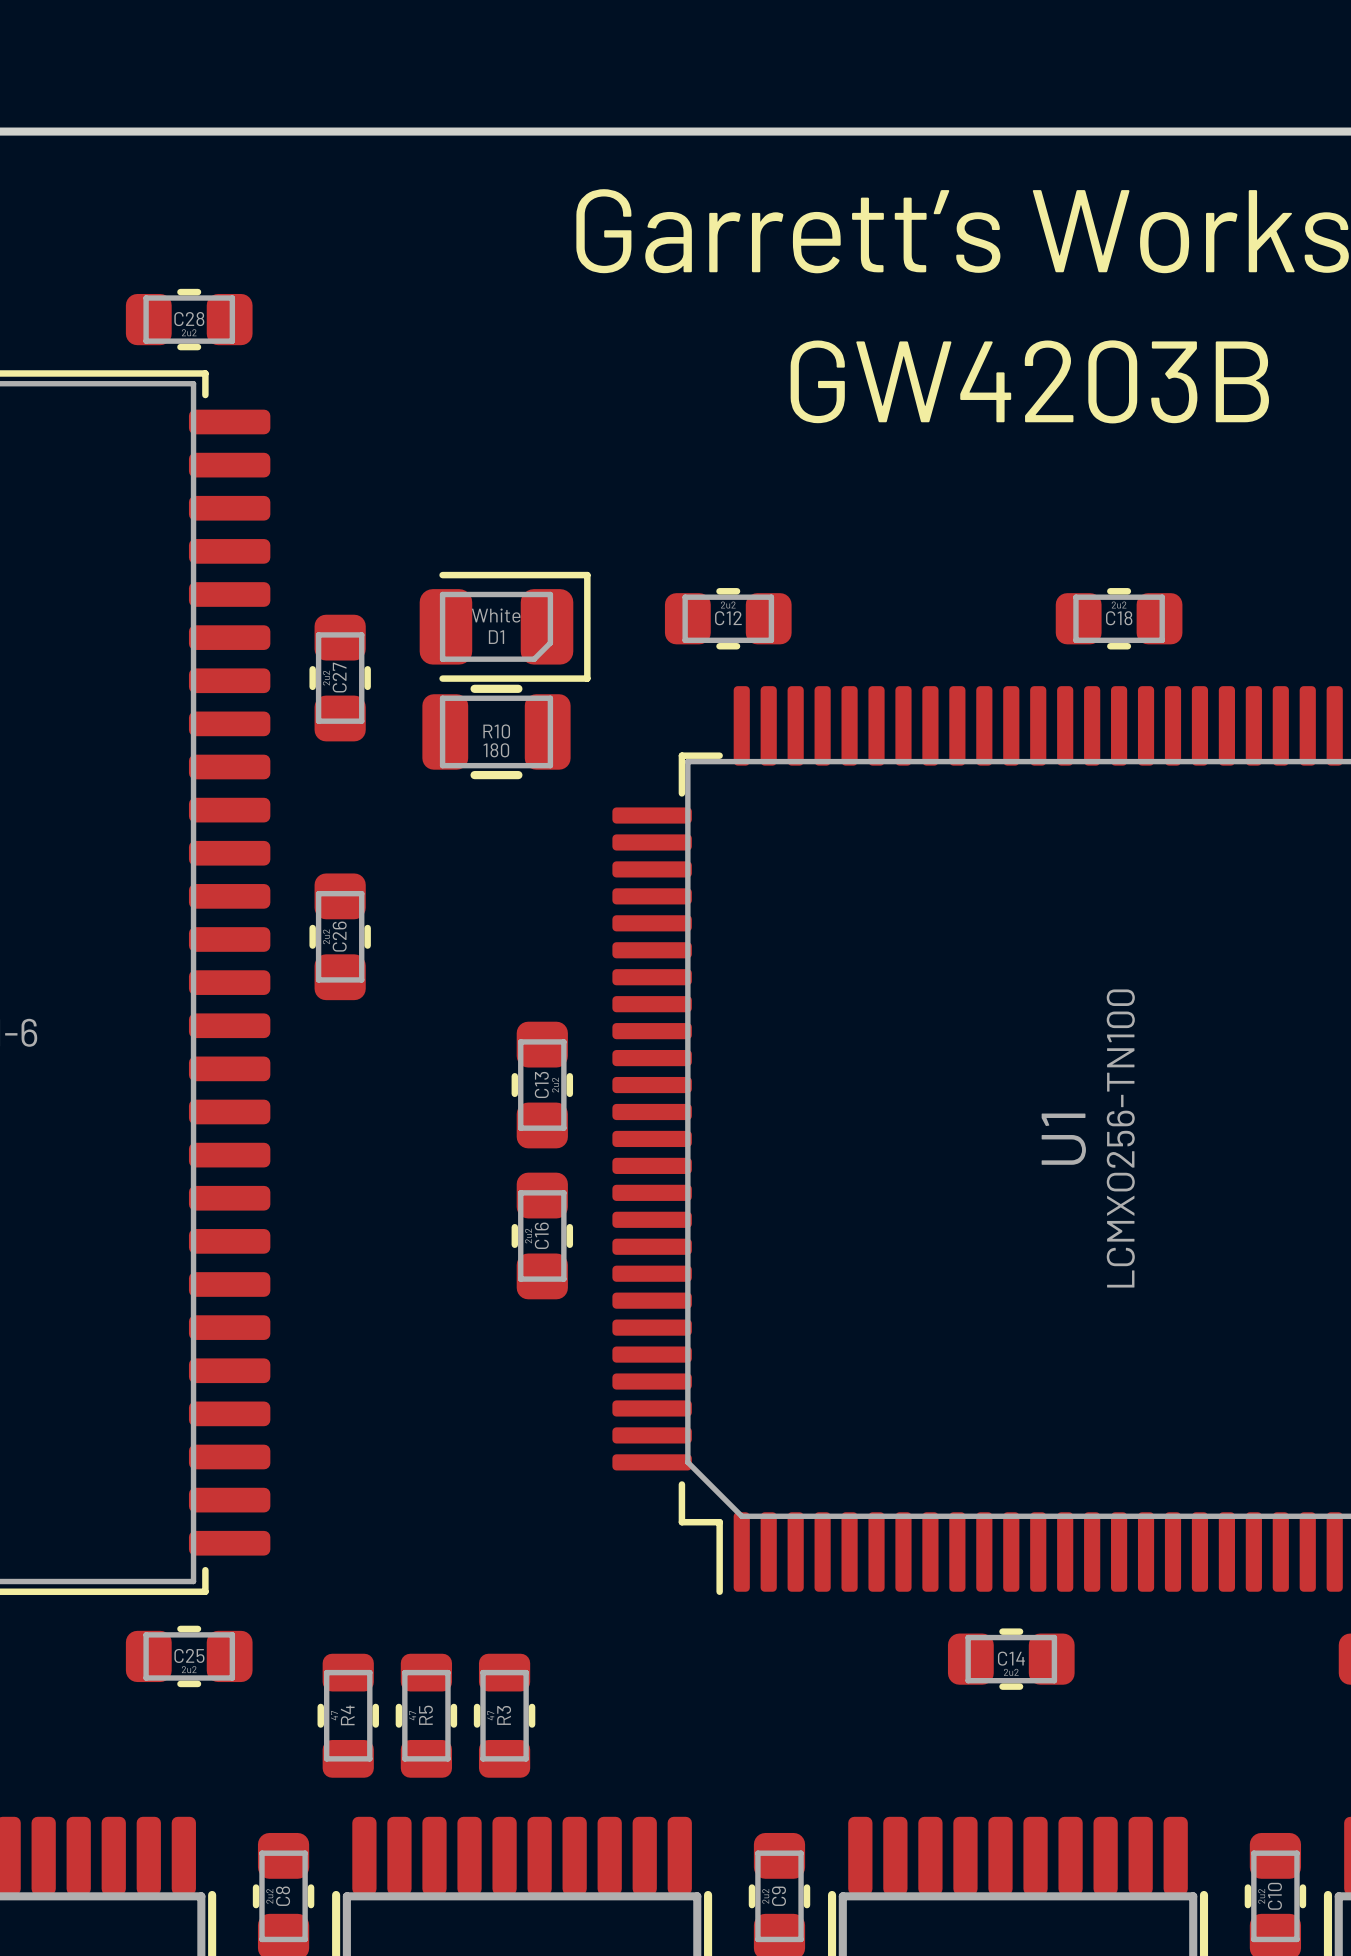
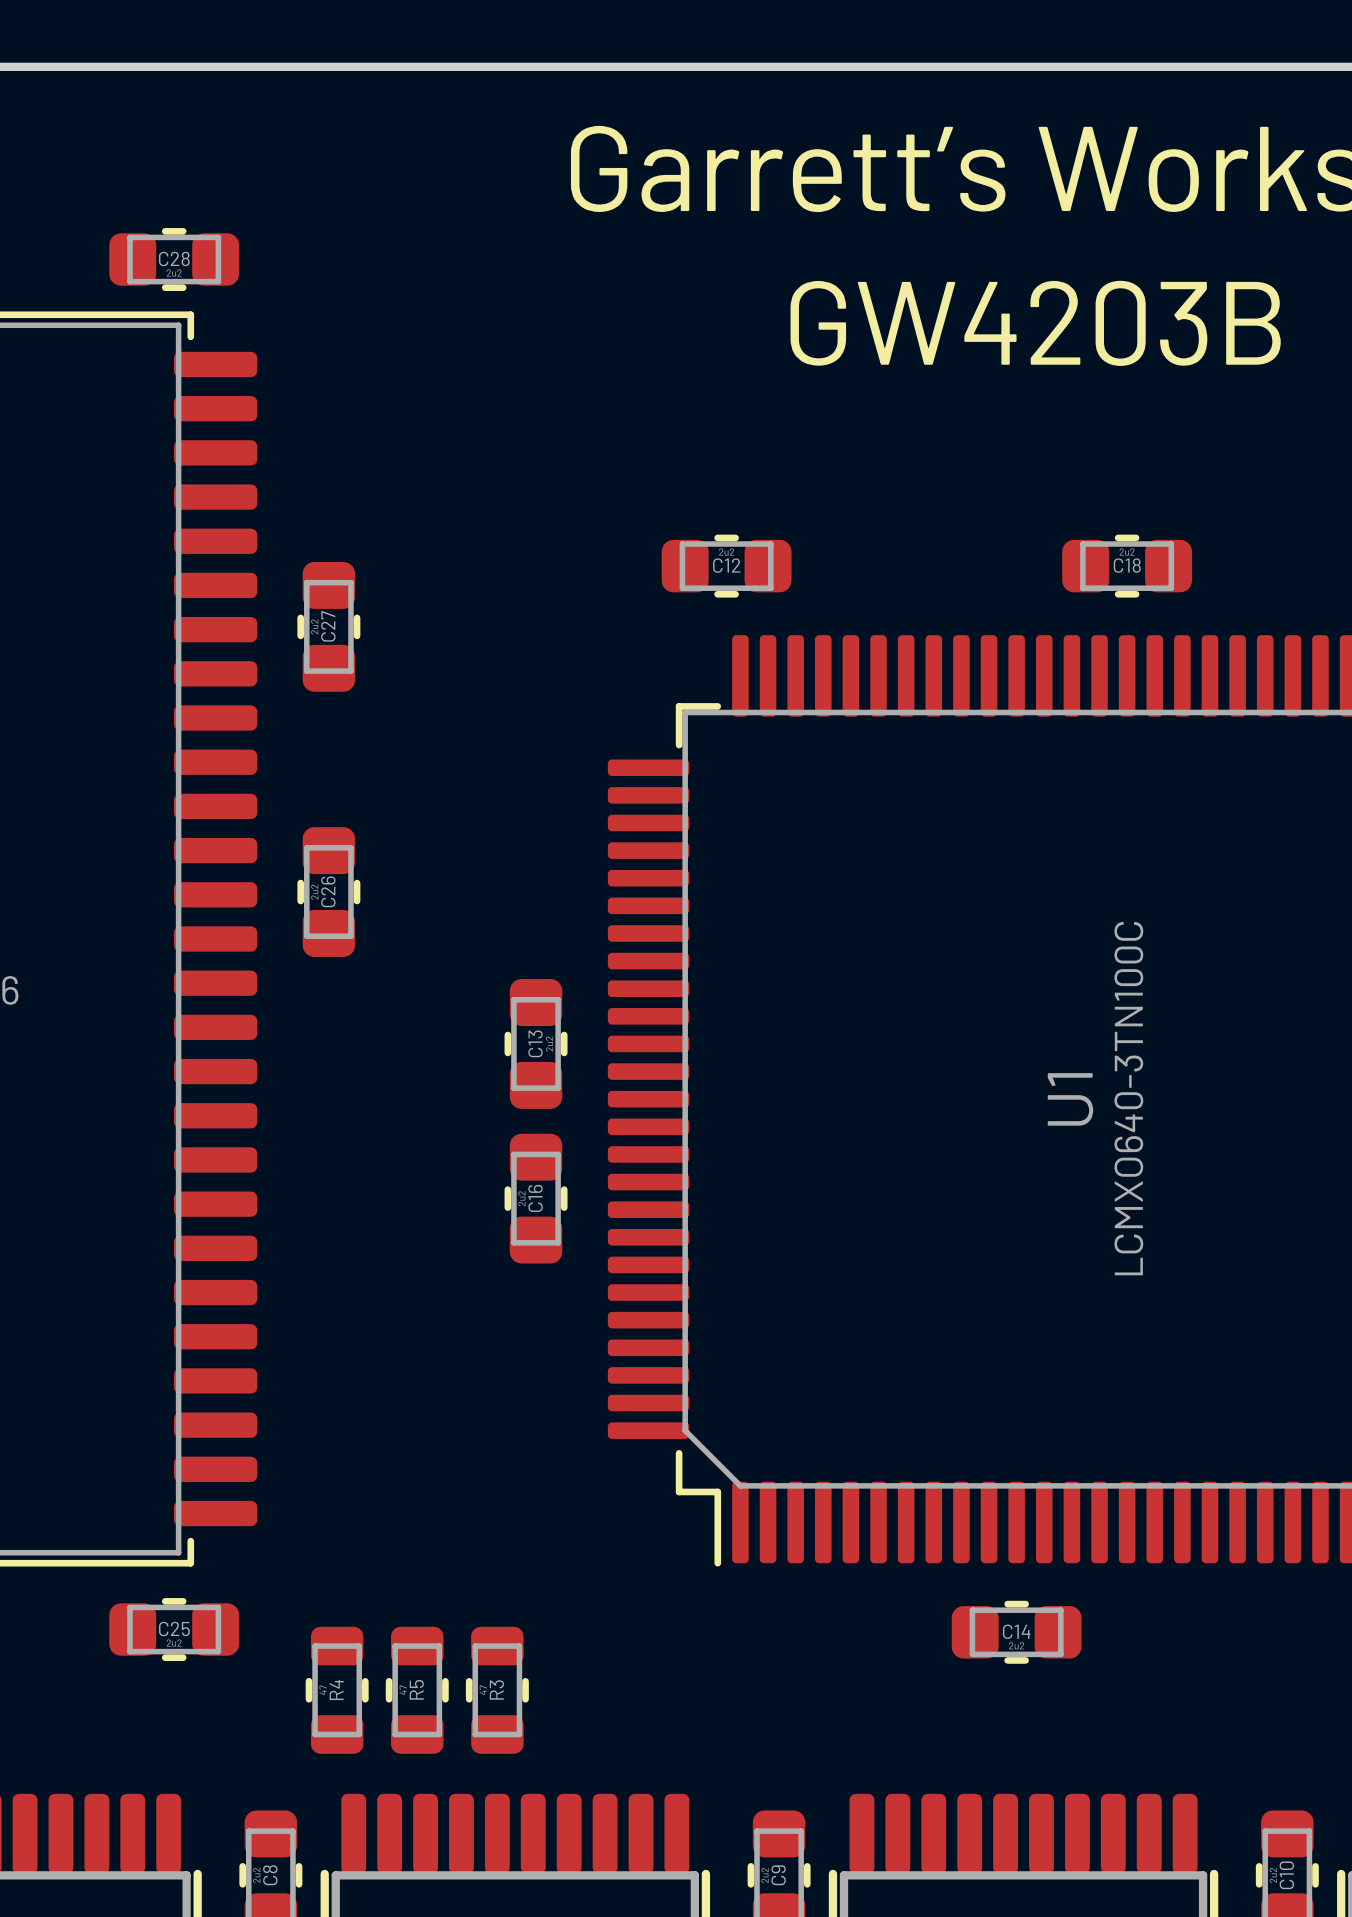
D1: White (505, 626) -> none
R10: 180 (496, 731) -> none
U1 value: LCMXO256-TN100 (1120, 1138) -> LCMXO640-3TN100C (1128, 1098)

